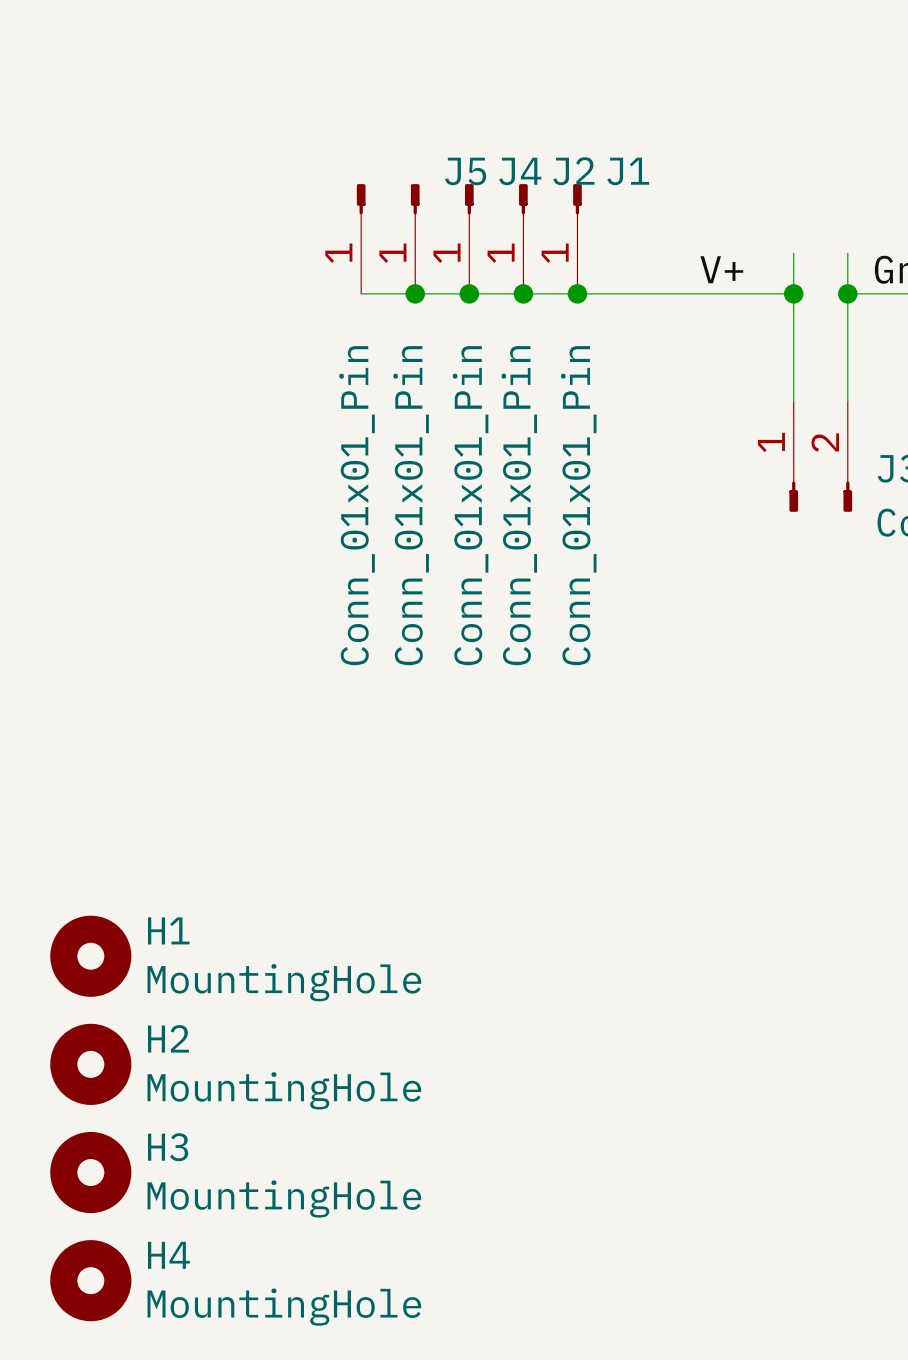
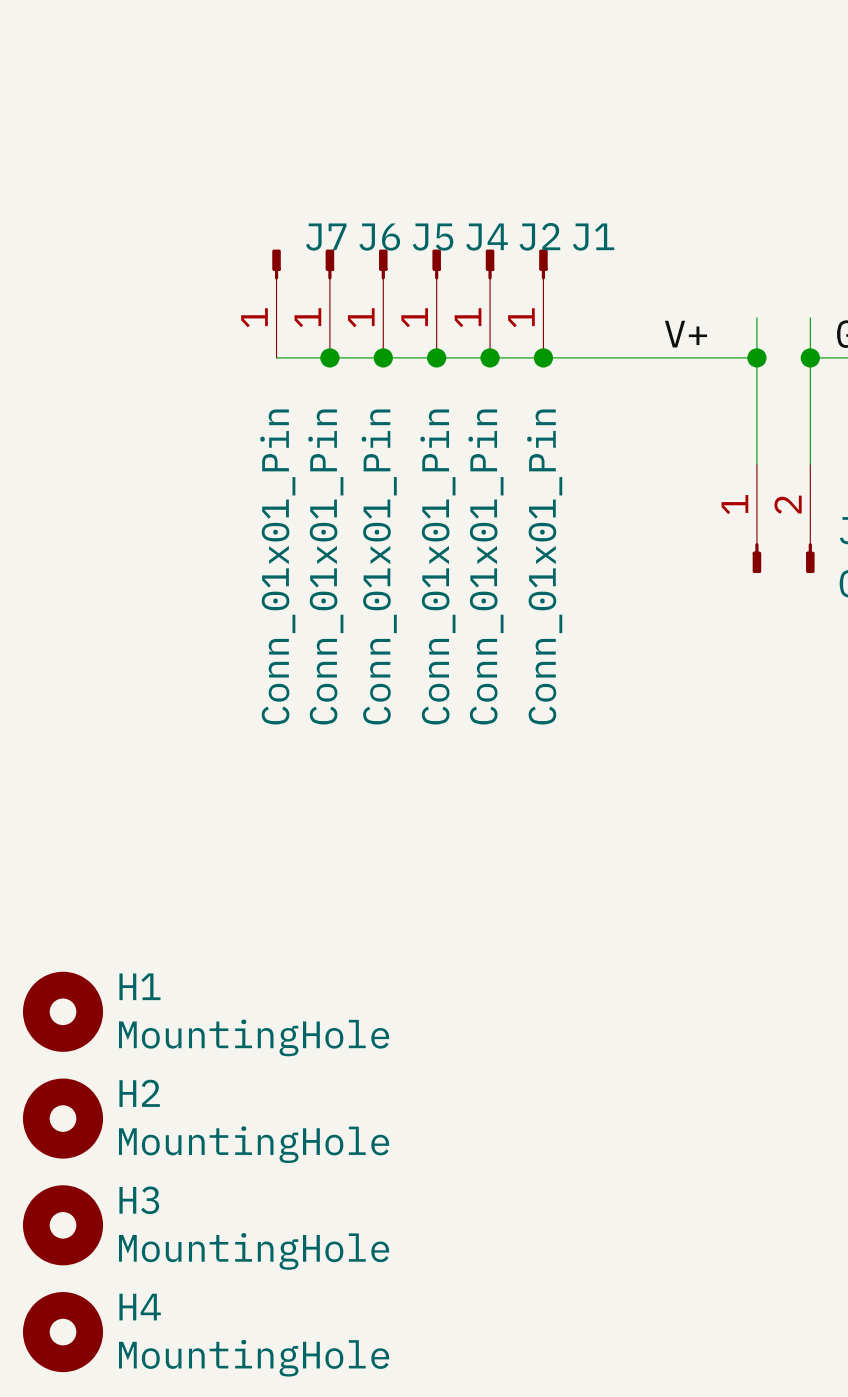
J6 name: none -> J6 (379, 237)
J7: none -> Conn_01x01_Pin (276, 303)
wire: none -> (276, 357) (329, 357)
junction: none -> (329, 357)

